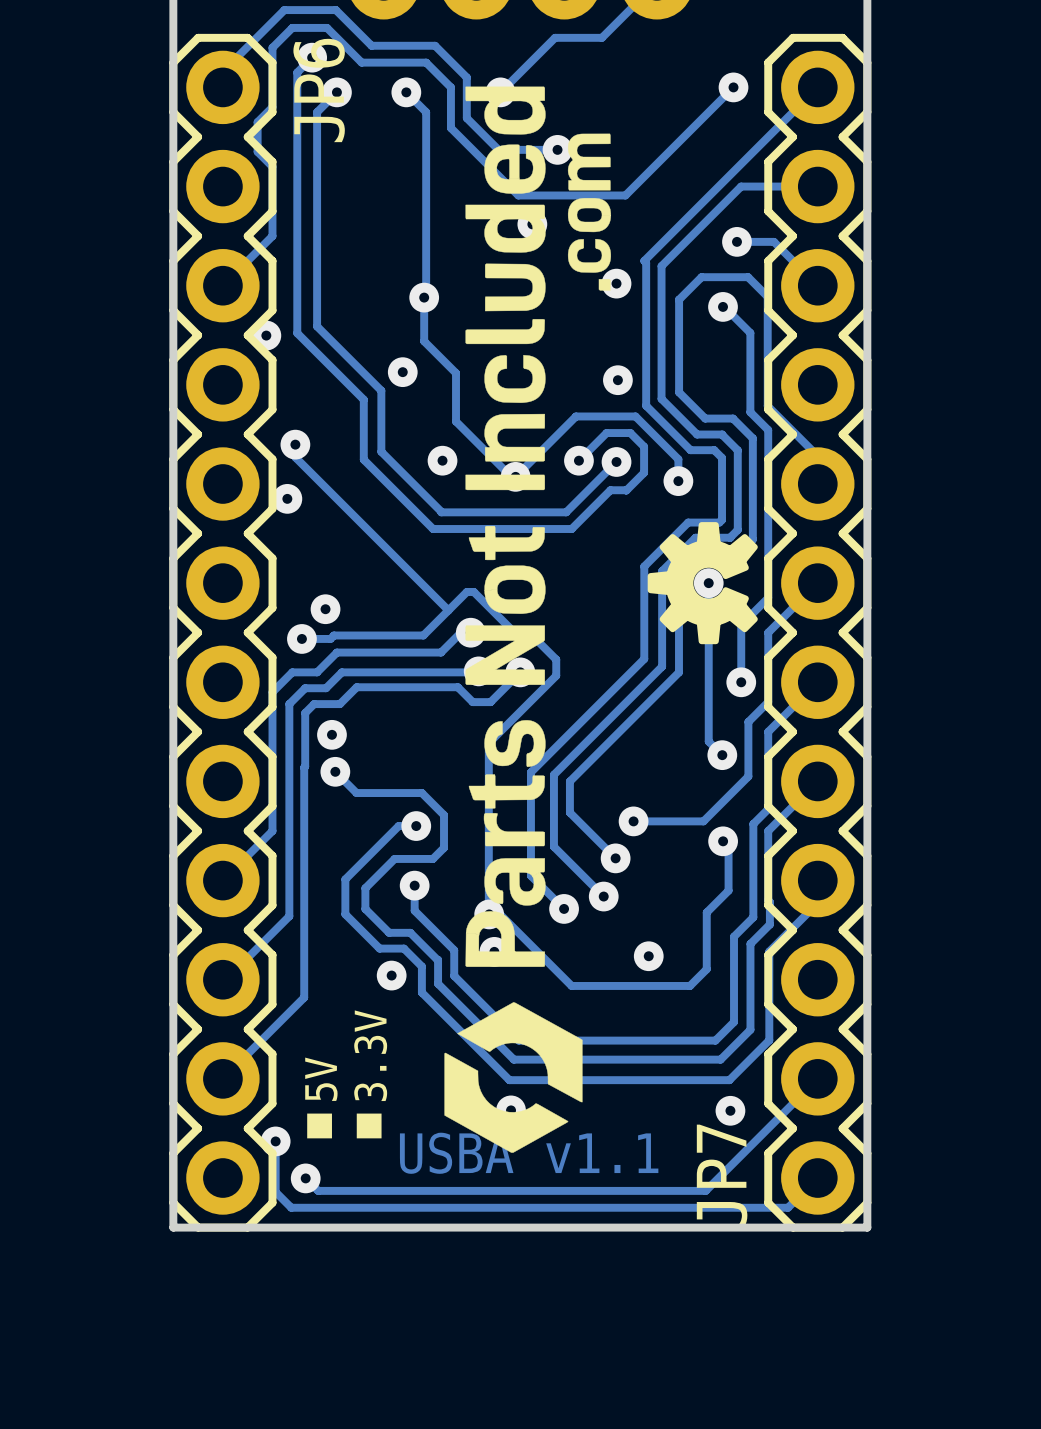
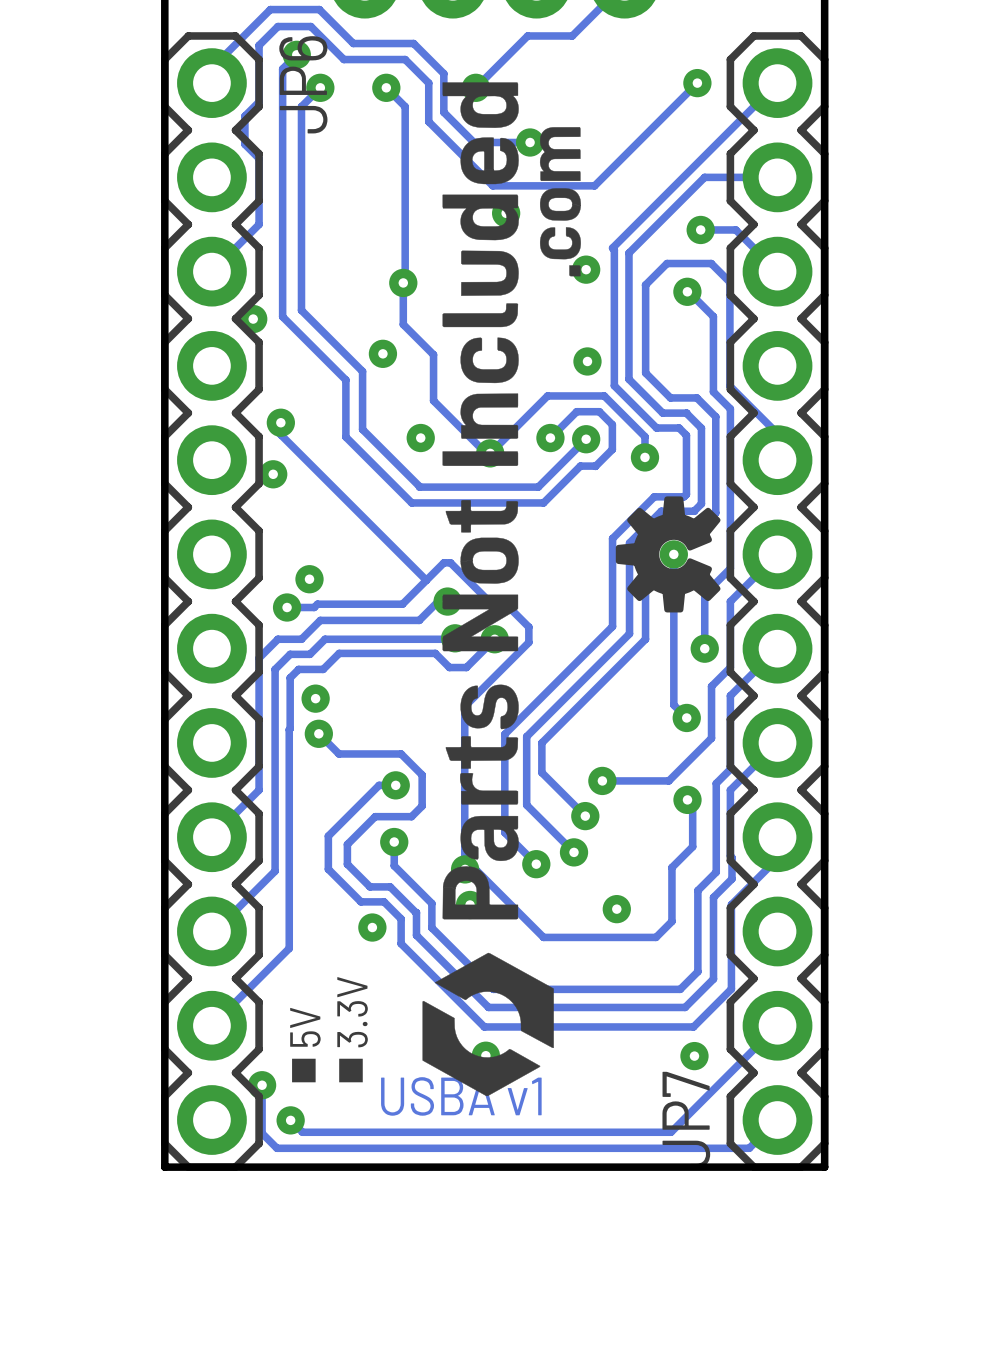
text: USBA v1.1 (529, 1153) -> USBA v1 (461, 1096)

